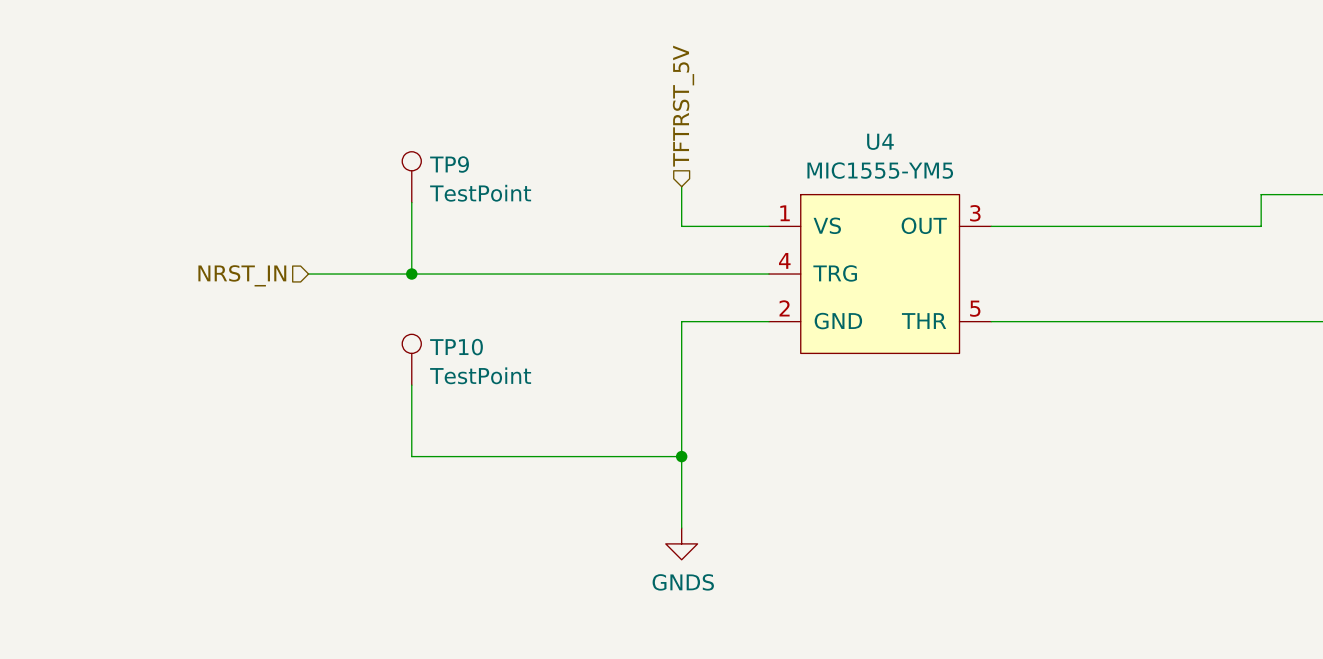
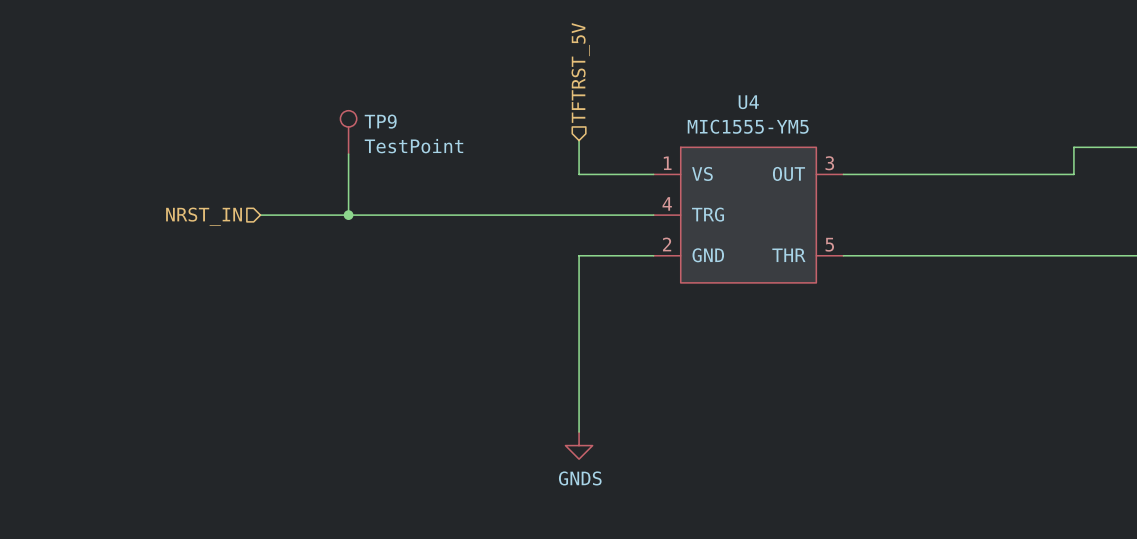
TP10: TestPoint (411, 359) -> none
wire: (411, 385) (411, 456) (681, 456) -> none
junction: (681, 456) -> none

